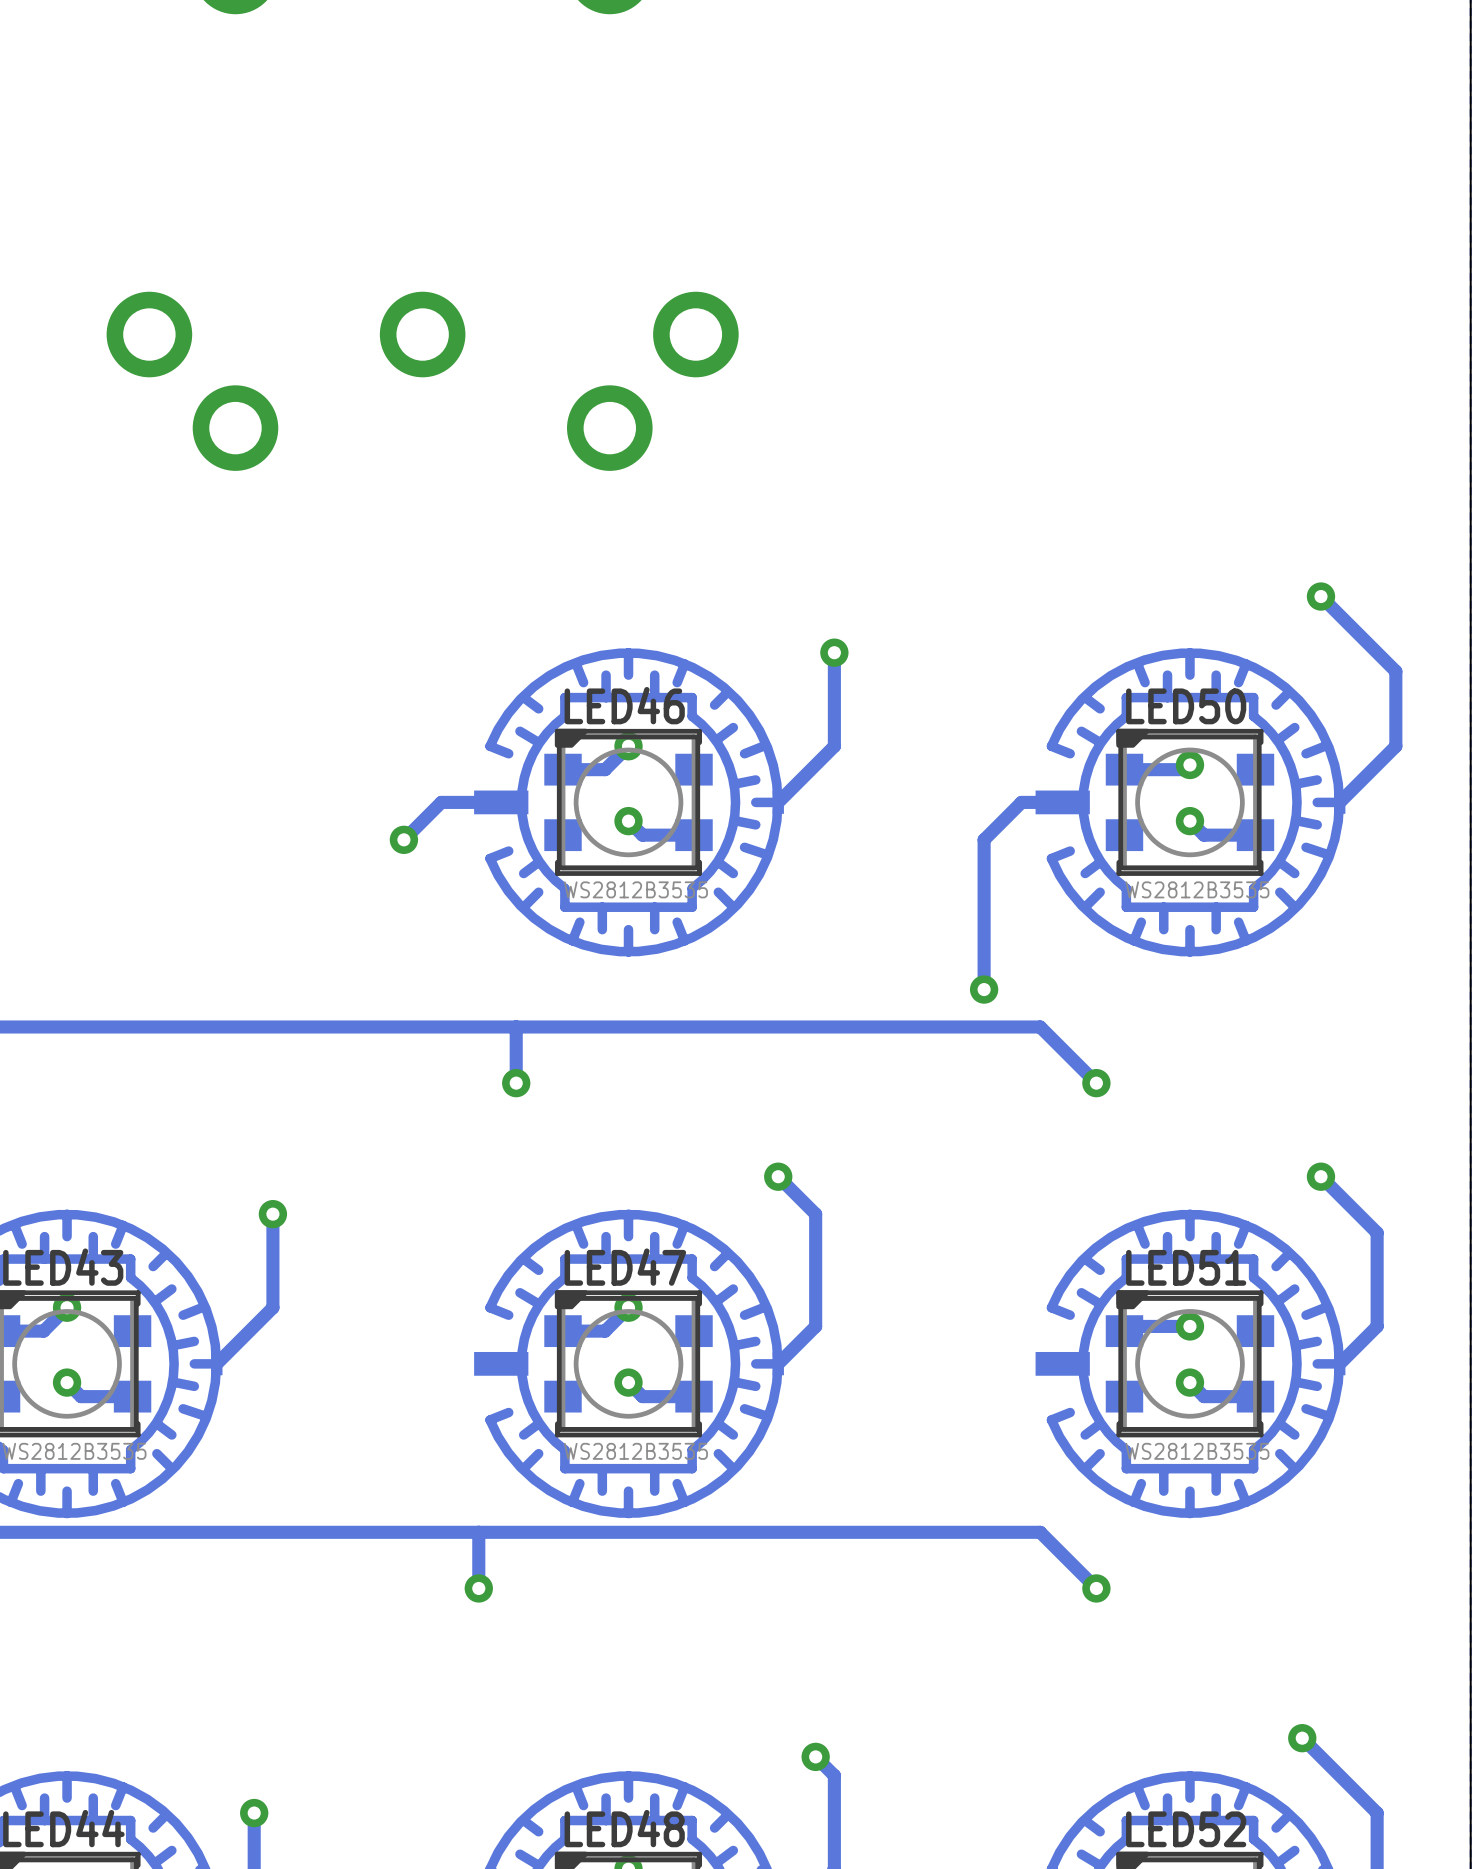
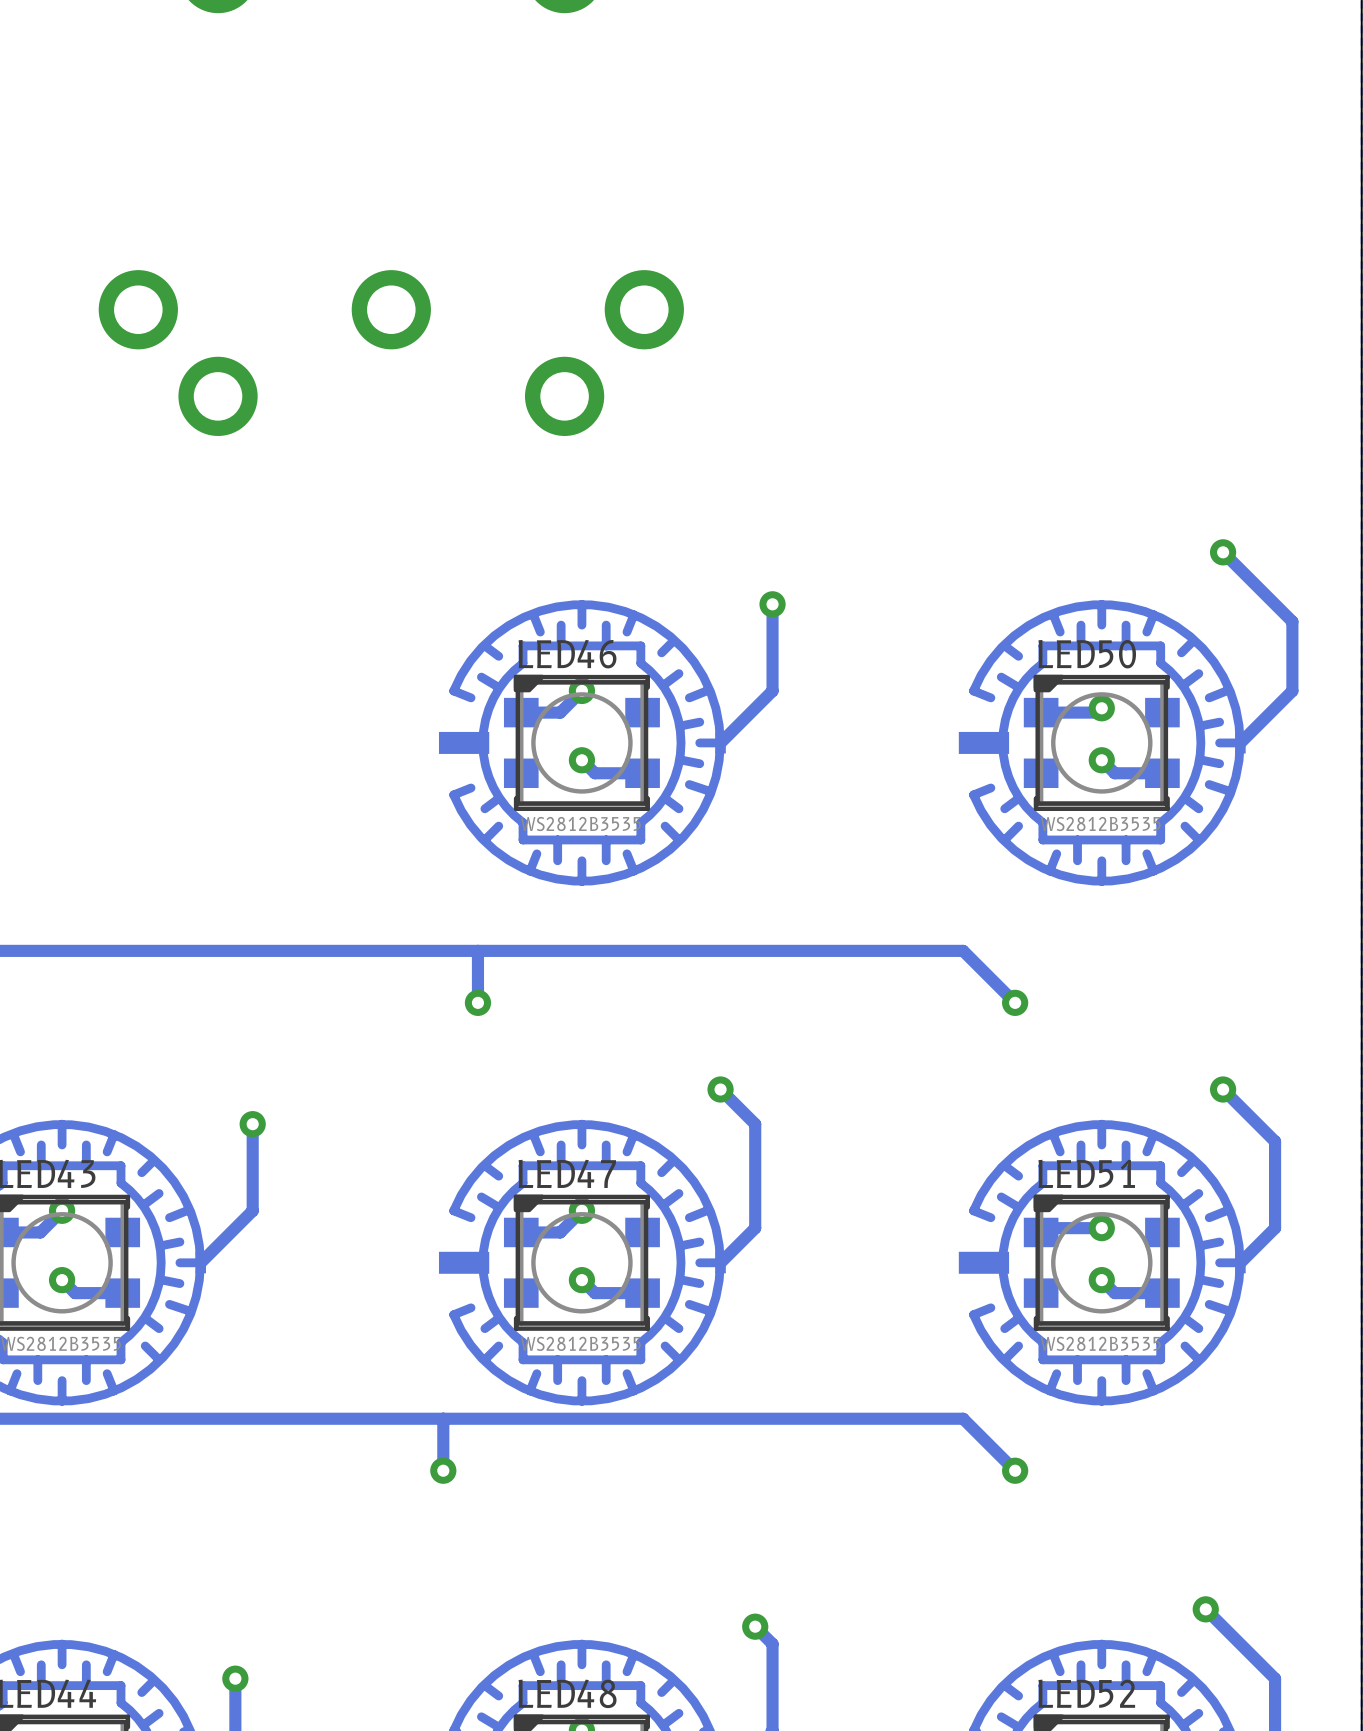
track: (478, 802) (441, 802) (403, 839) -> none
track: (1040, 802) (1021, 802) (984, 839) (984, 989) -> none
via: (403, 839) -> none
via: (984, 989) -> none

